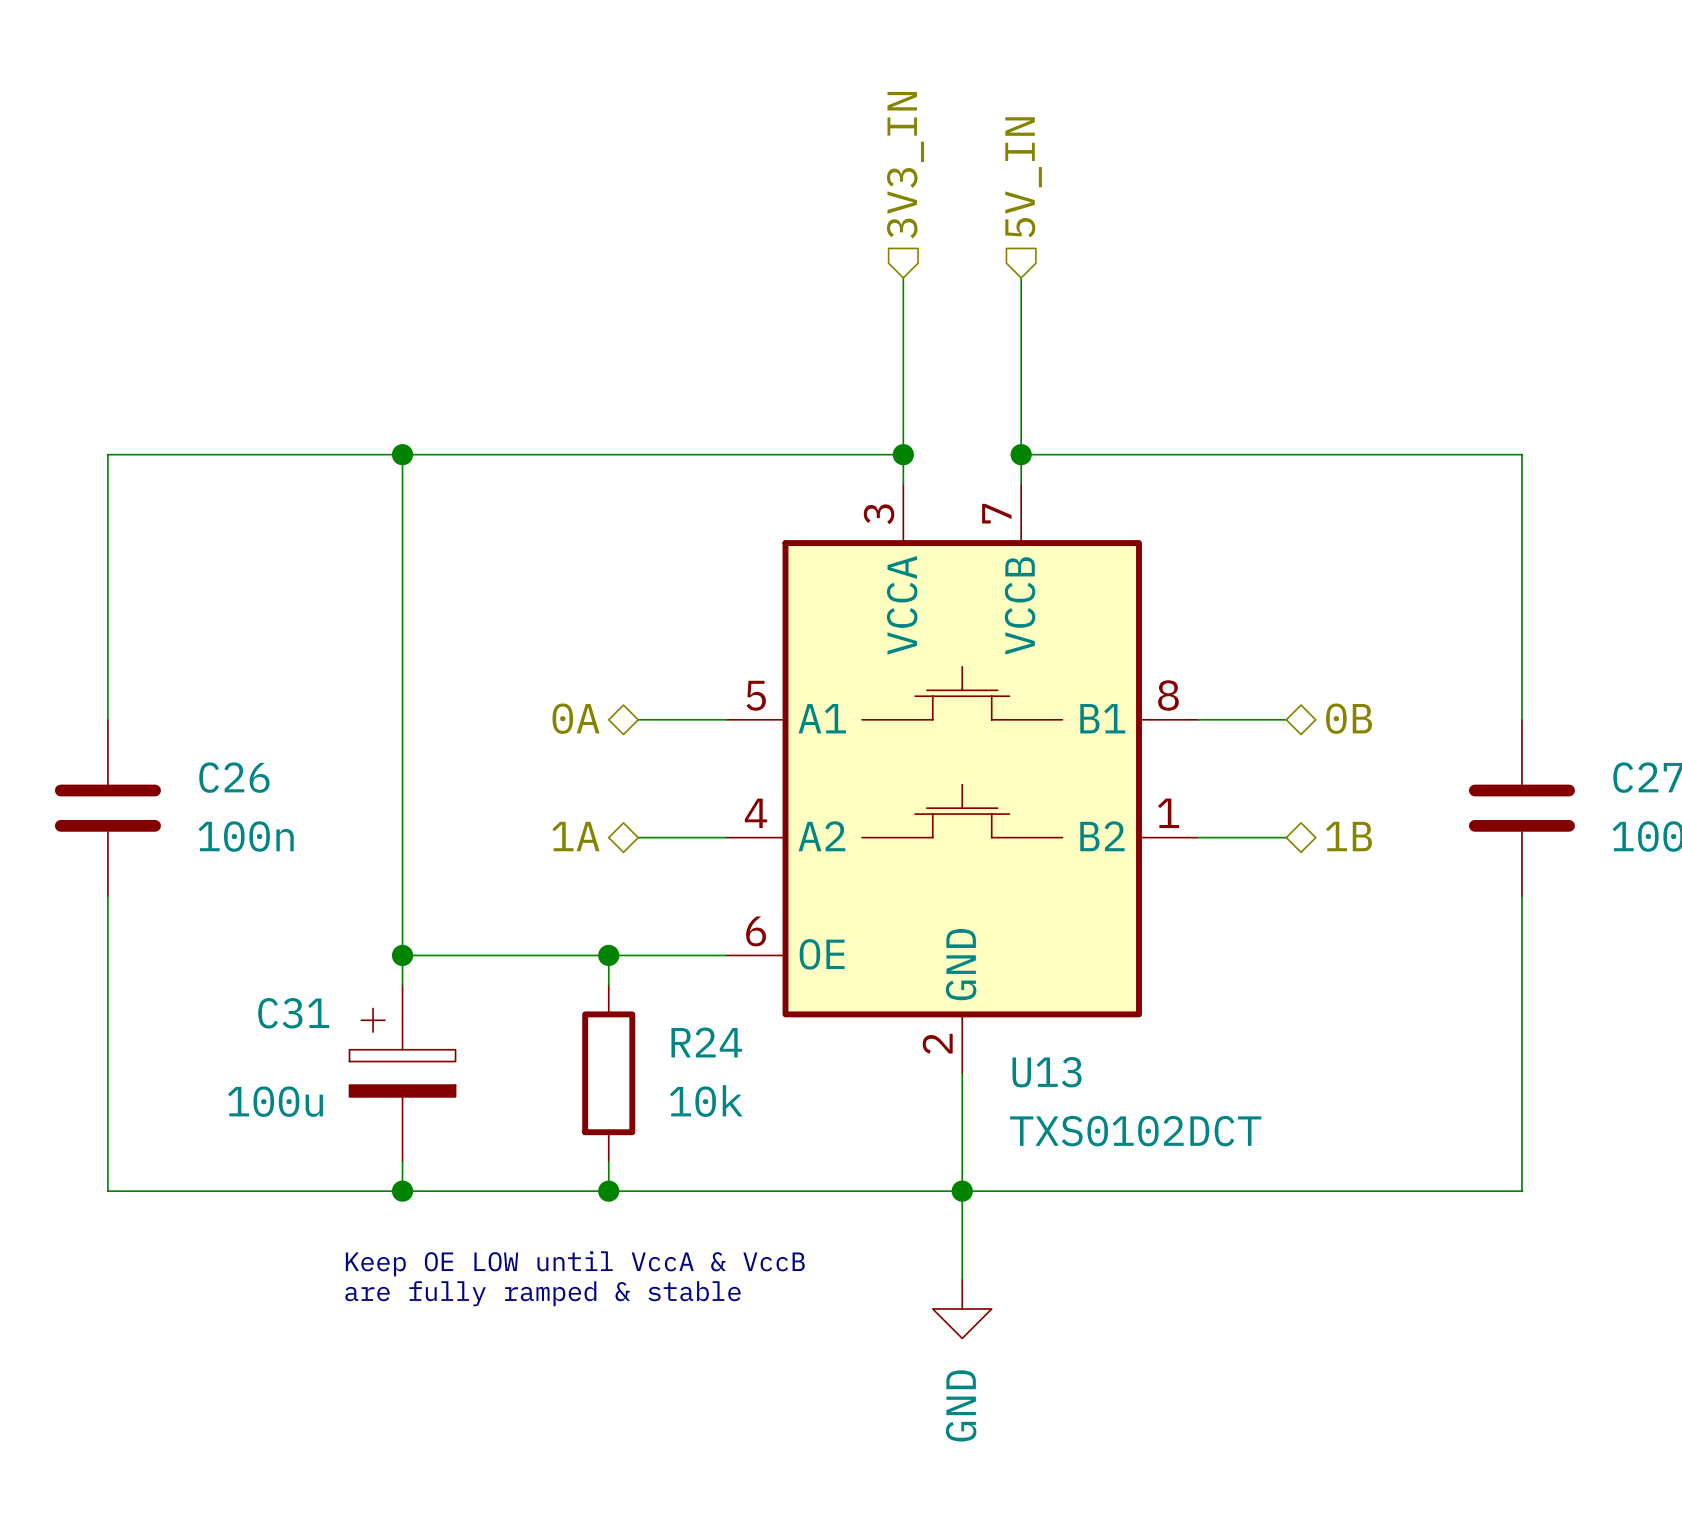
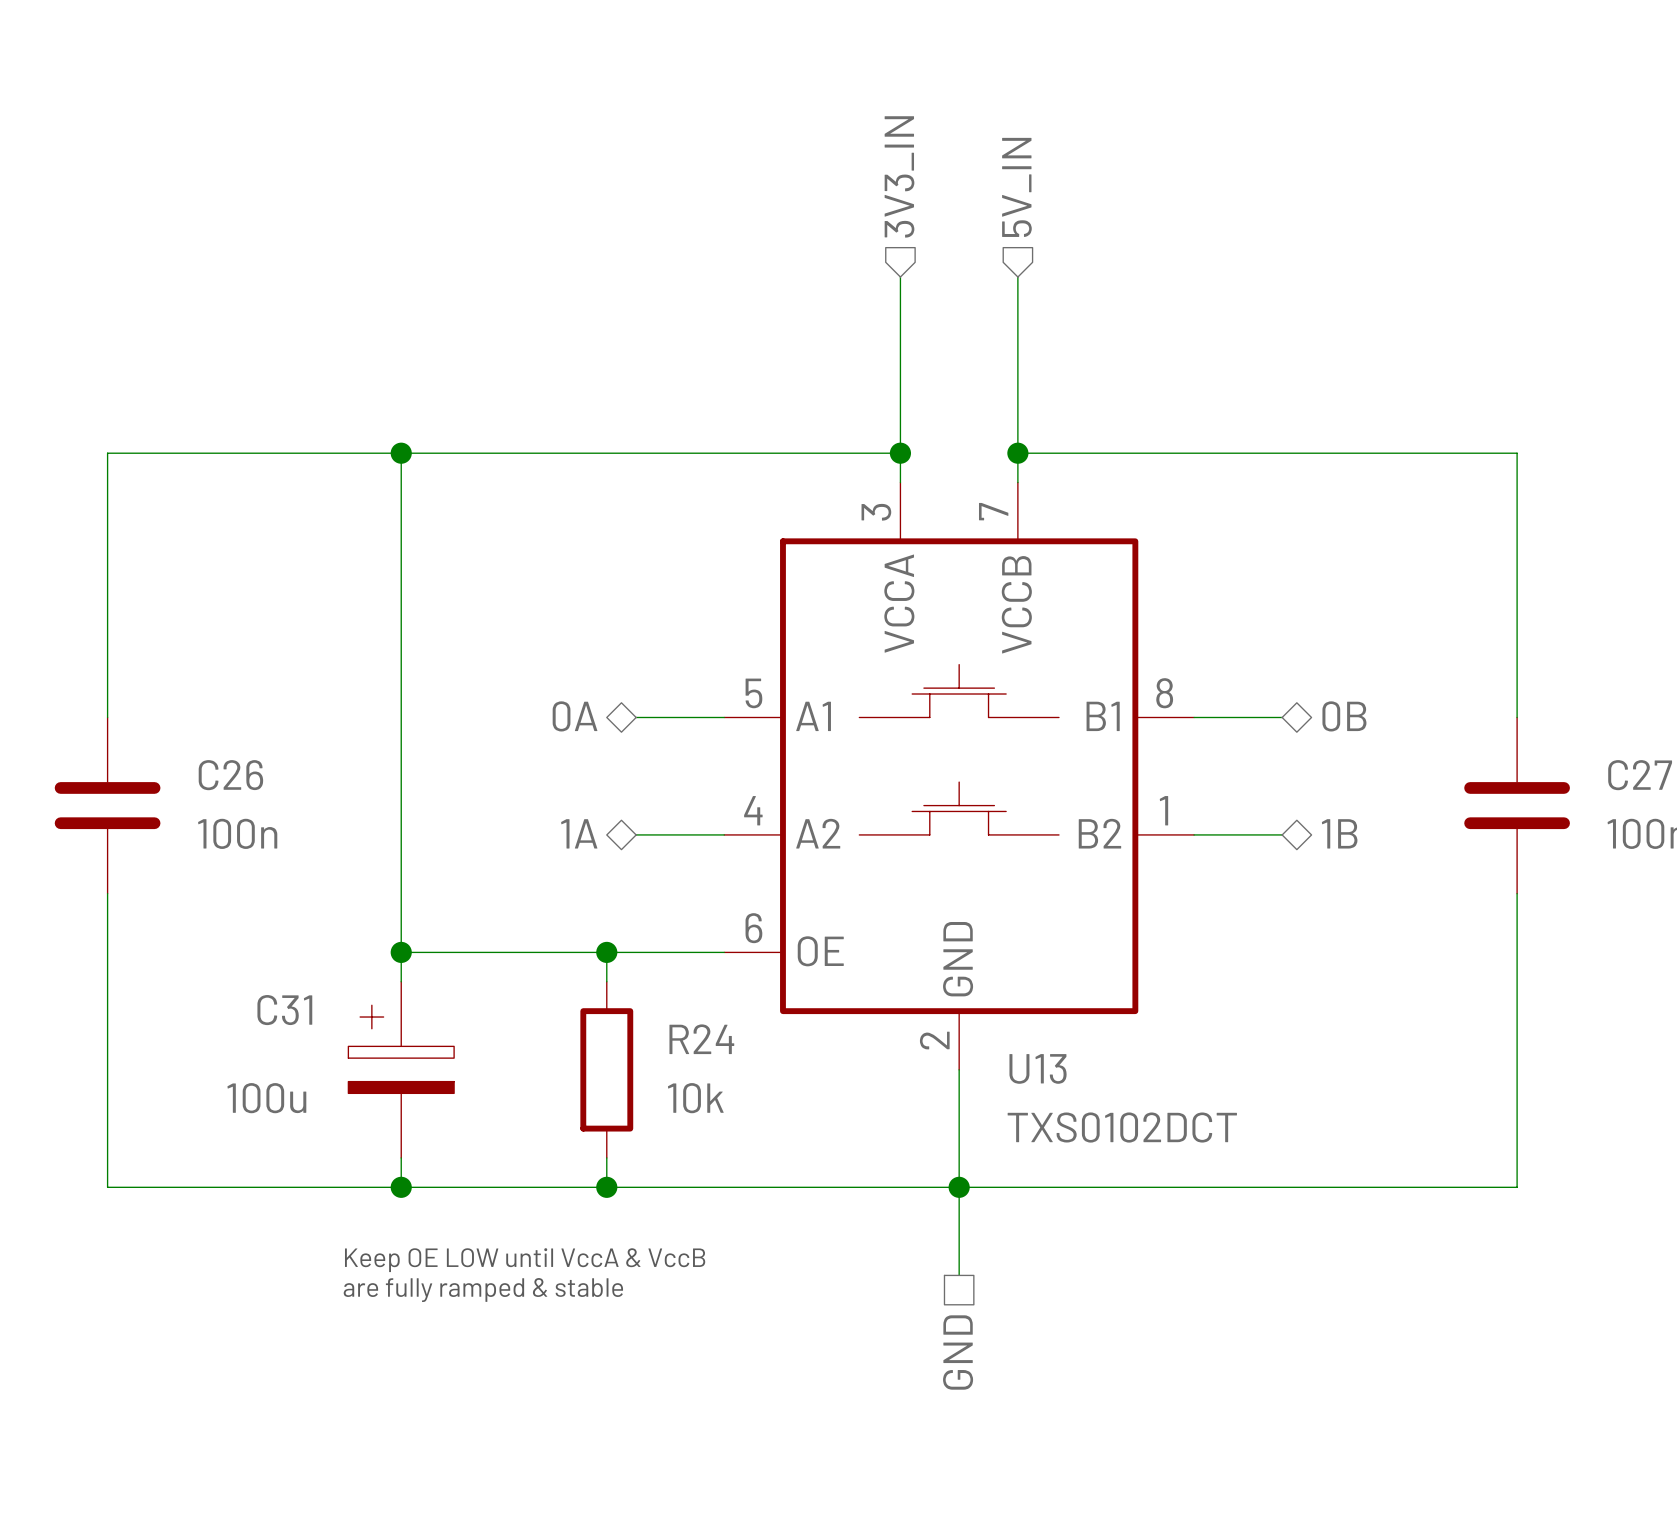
power symbol: GND (962, 1308) -> none
hierarchical label: none -> GND (958, 1352)

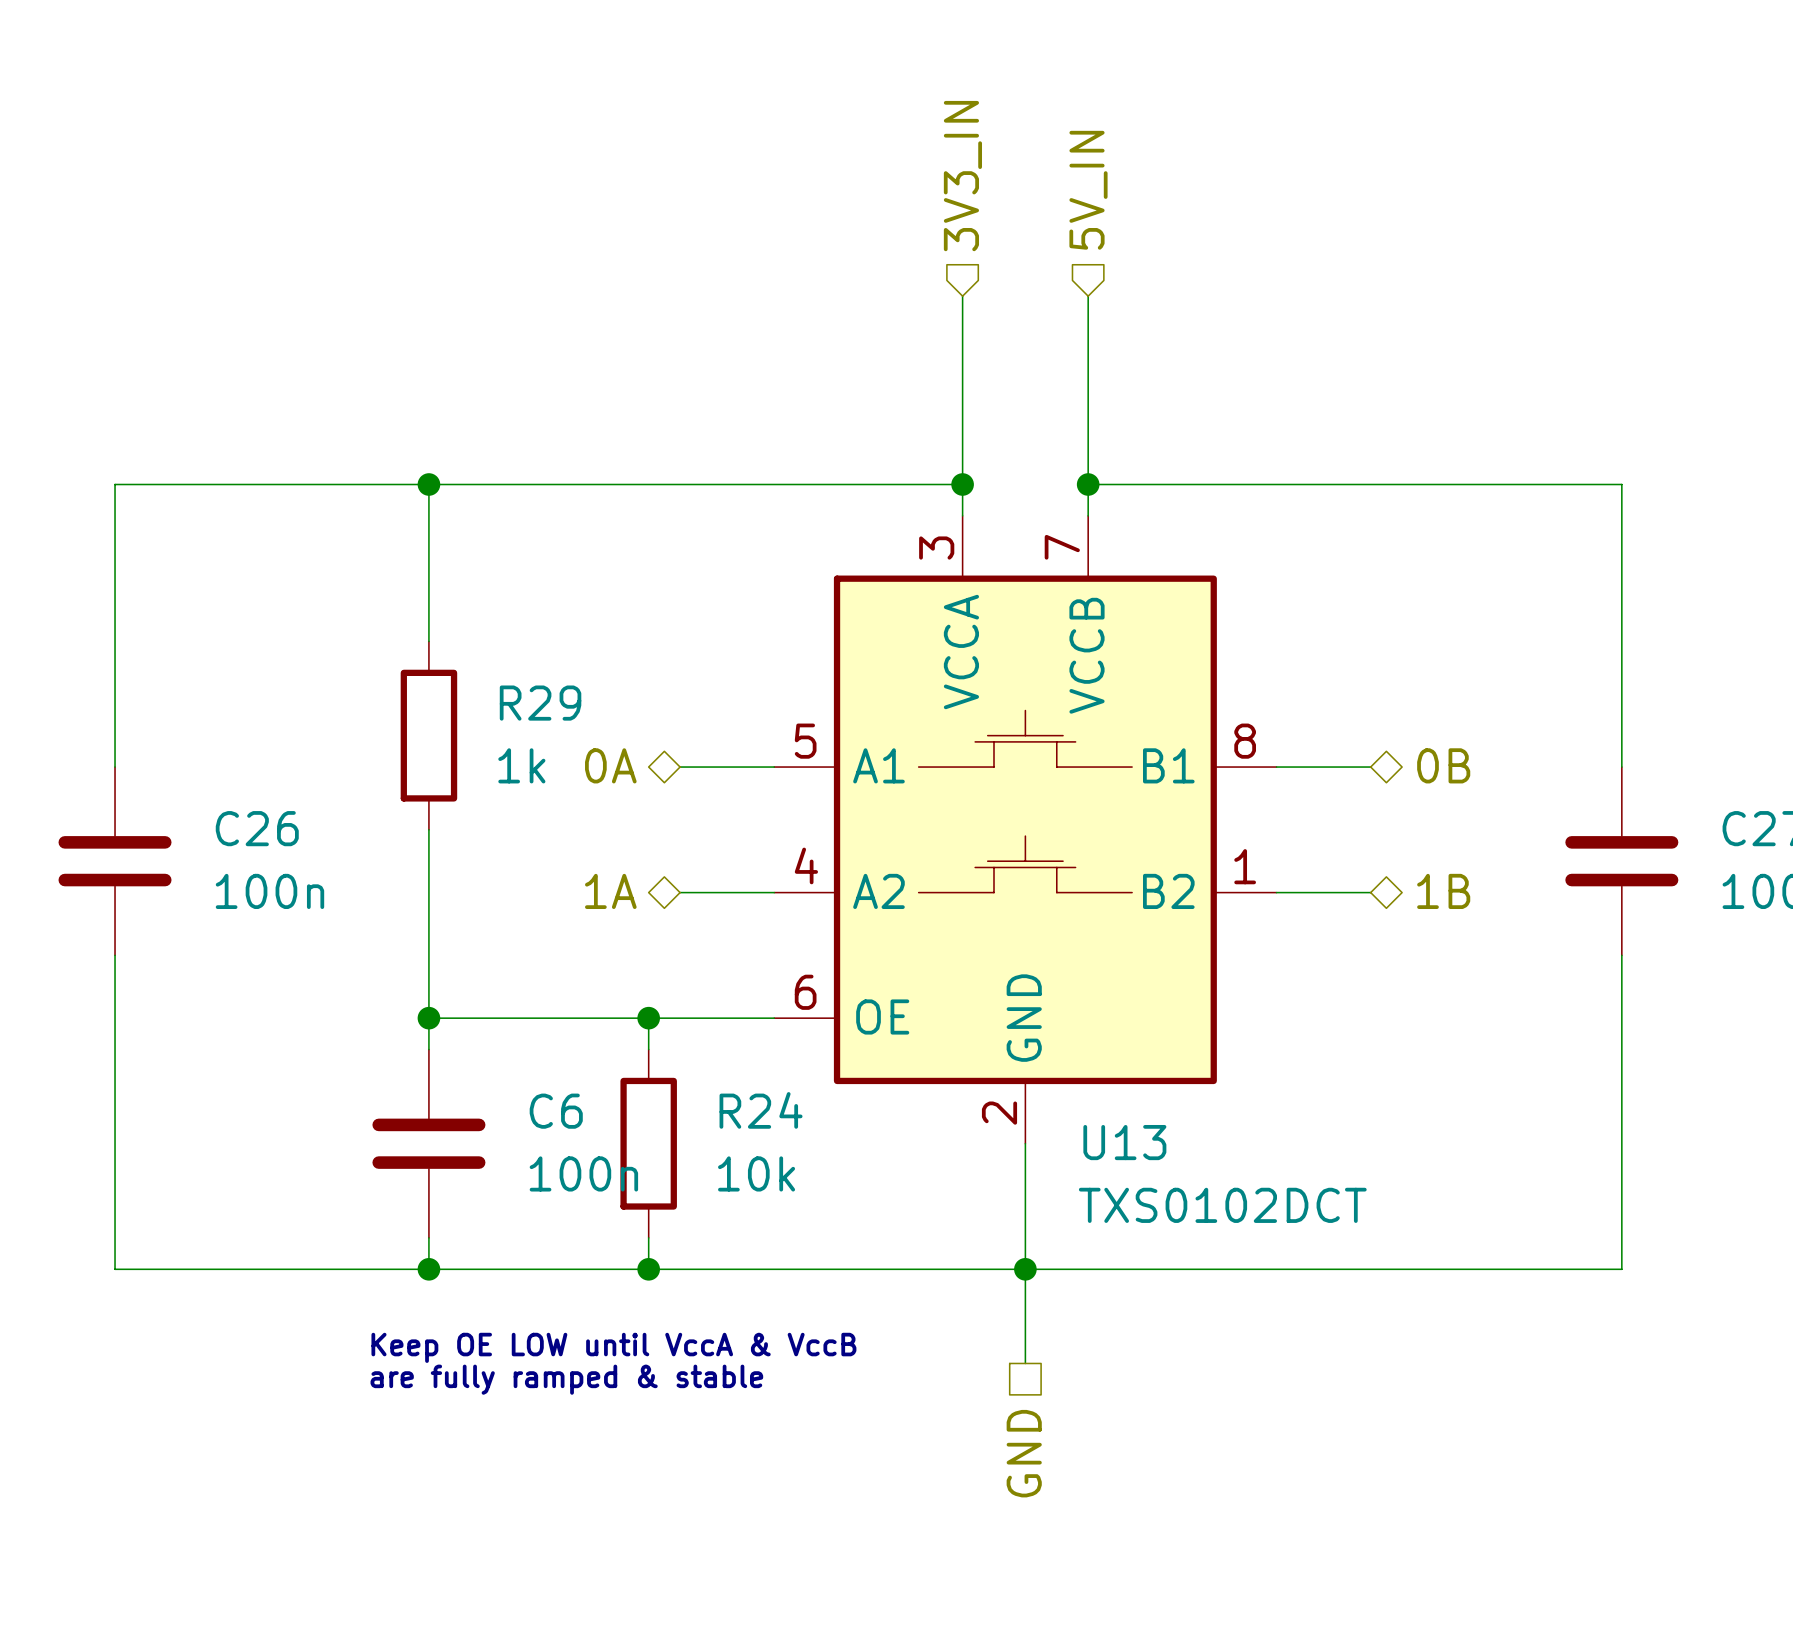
wire: (401, 600) (401, 776) -> none
R29: none -> 1k (428, 735)
C31: 100u (401, 1069) -> none
C6: none -> 100n (428, 1143)

